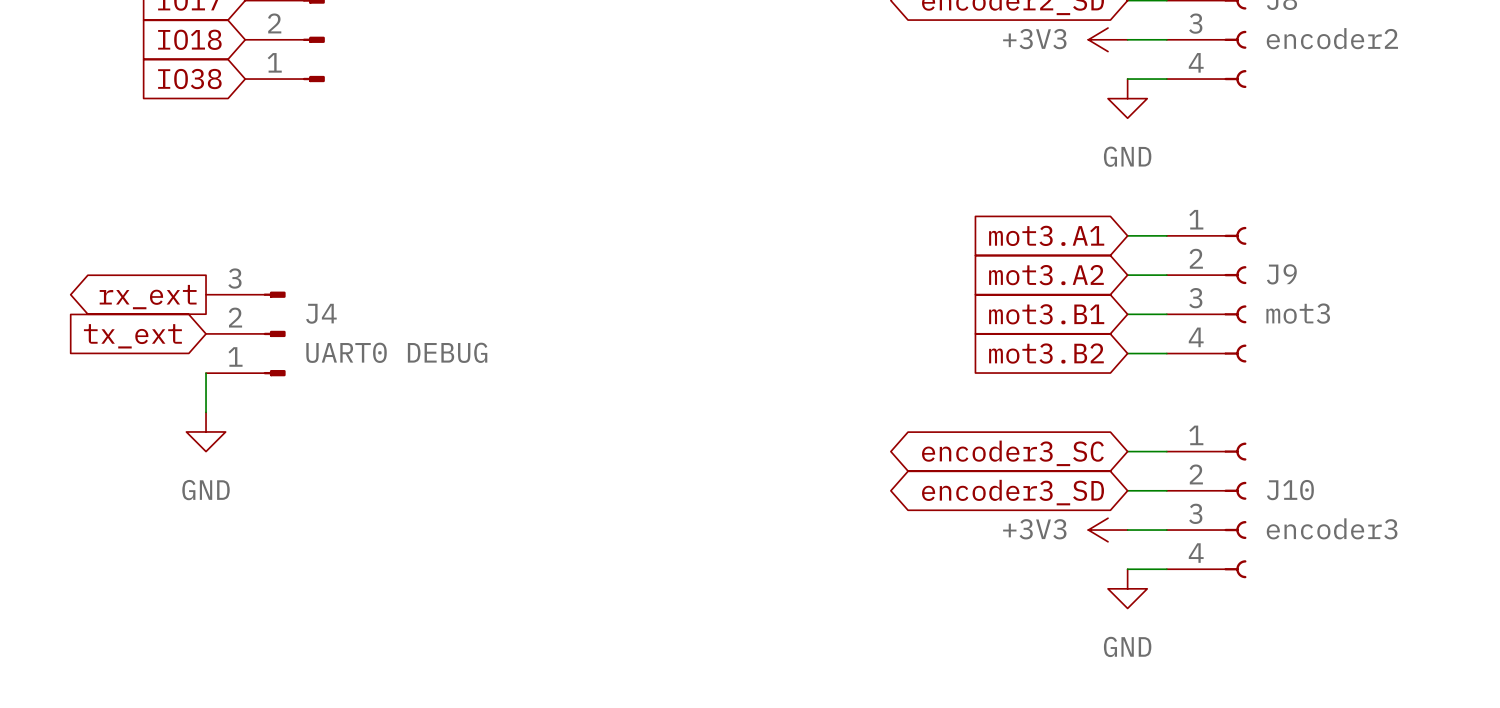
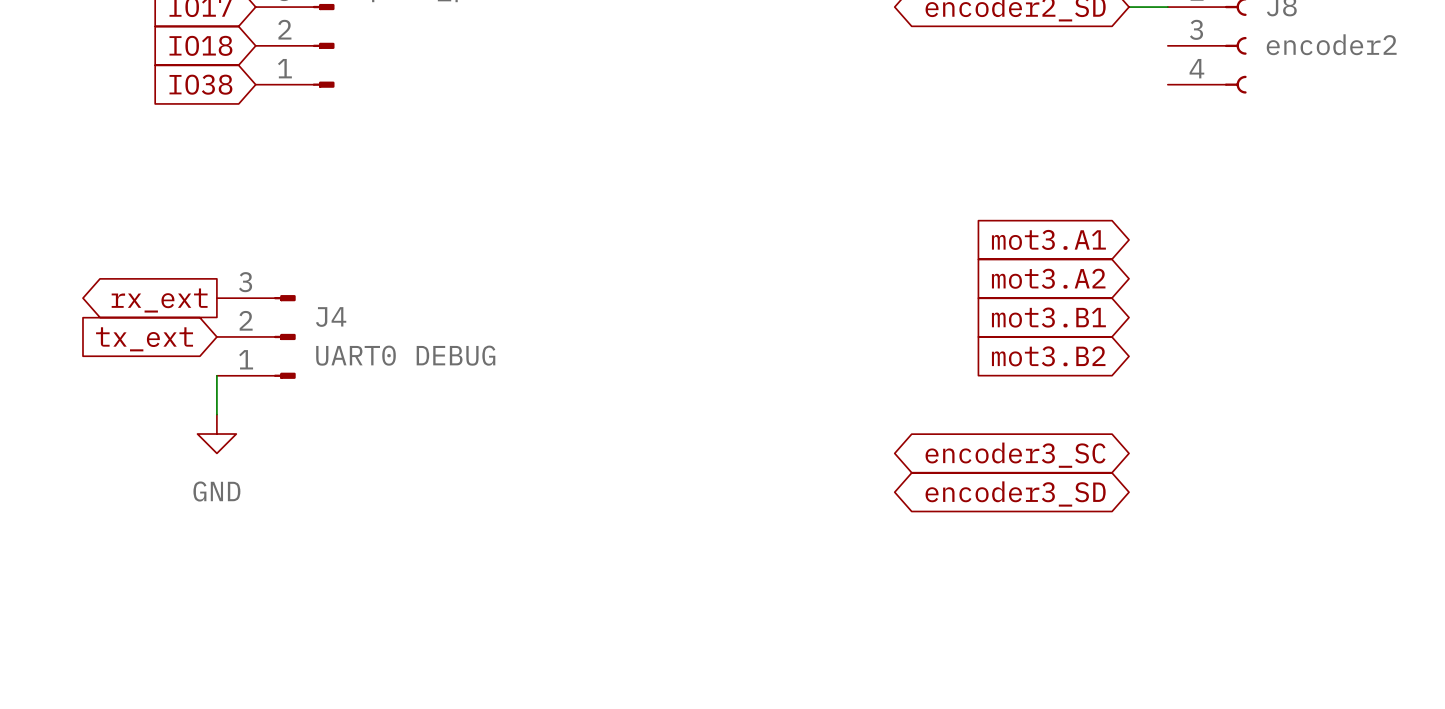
power symbol: +3V3 (1108, 39) -> none
wire: (1127, 39) (1166, 39) -> none
wire: (1127, 79) (1166, 79) -> none
power symbol: GND (1127, 98) -> none
wire: (1127, 235) (1166, 235) -> none
wire: (1127, 275) (1166, 275) -> none
J9: mot3 (1206, 294) -> none
wire: (1127, 314) (1166, 314) -> none
wire: (1127, 353) (1166, 353) -> none
wire: (1127, 451) (1166, 451) -> none
wire: (1127, 490) (1166, 490) -> none
J10: encoder3 (1206, 510) -> none
power symbol: +3V3 (1108, 530) -> none
wire: (1127, 530) (1166, 530) -> none
wire: (1127, 569) (1166, 569) -> none
power symbol: GND (1127, 588) -> none

